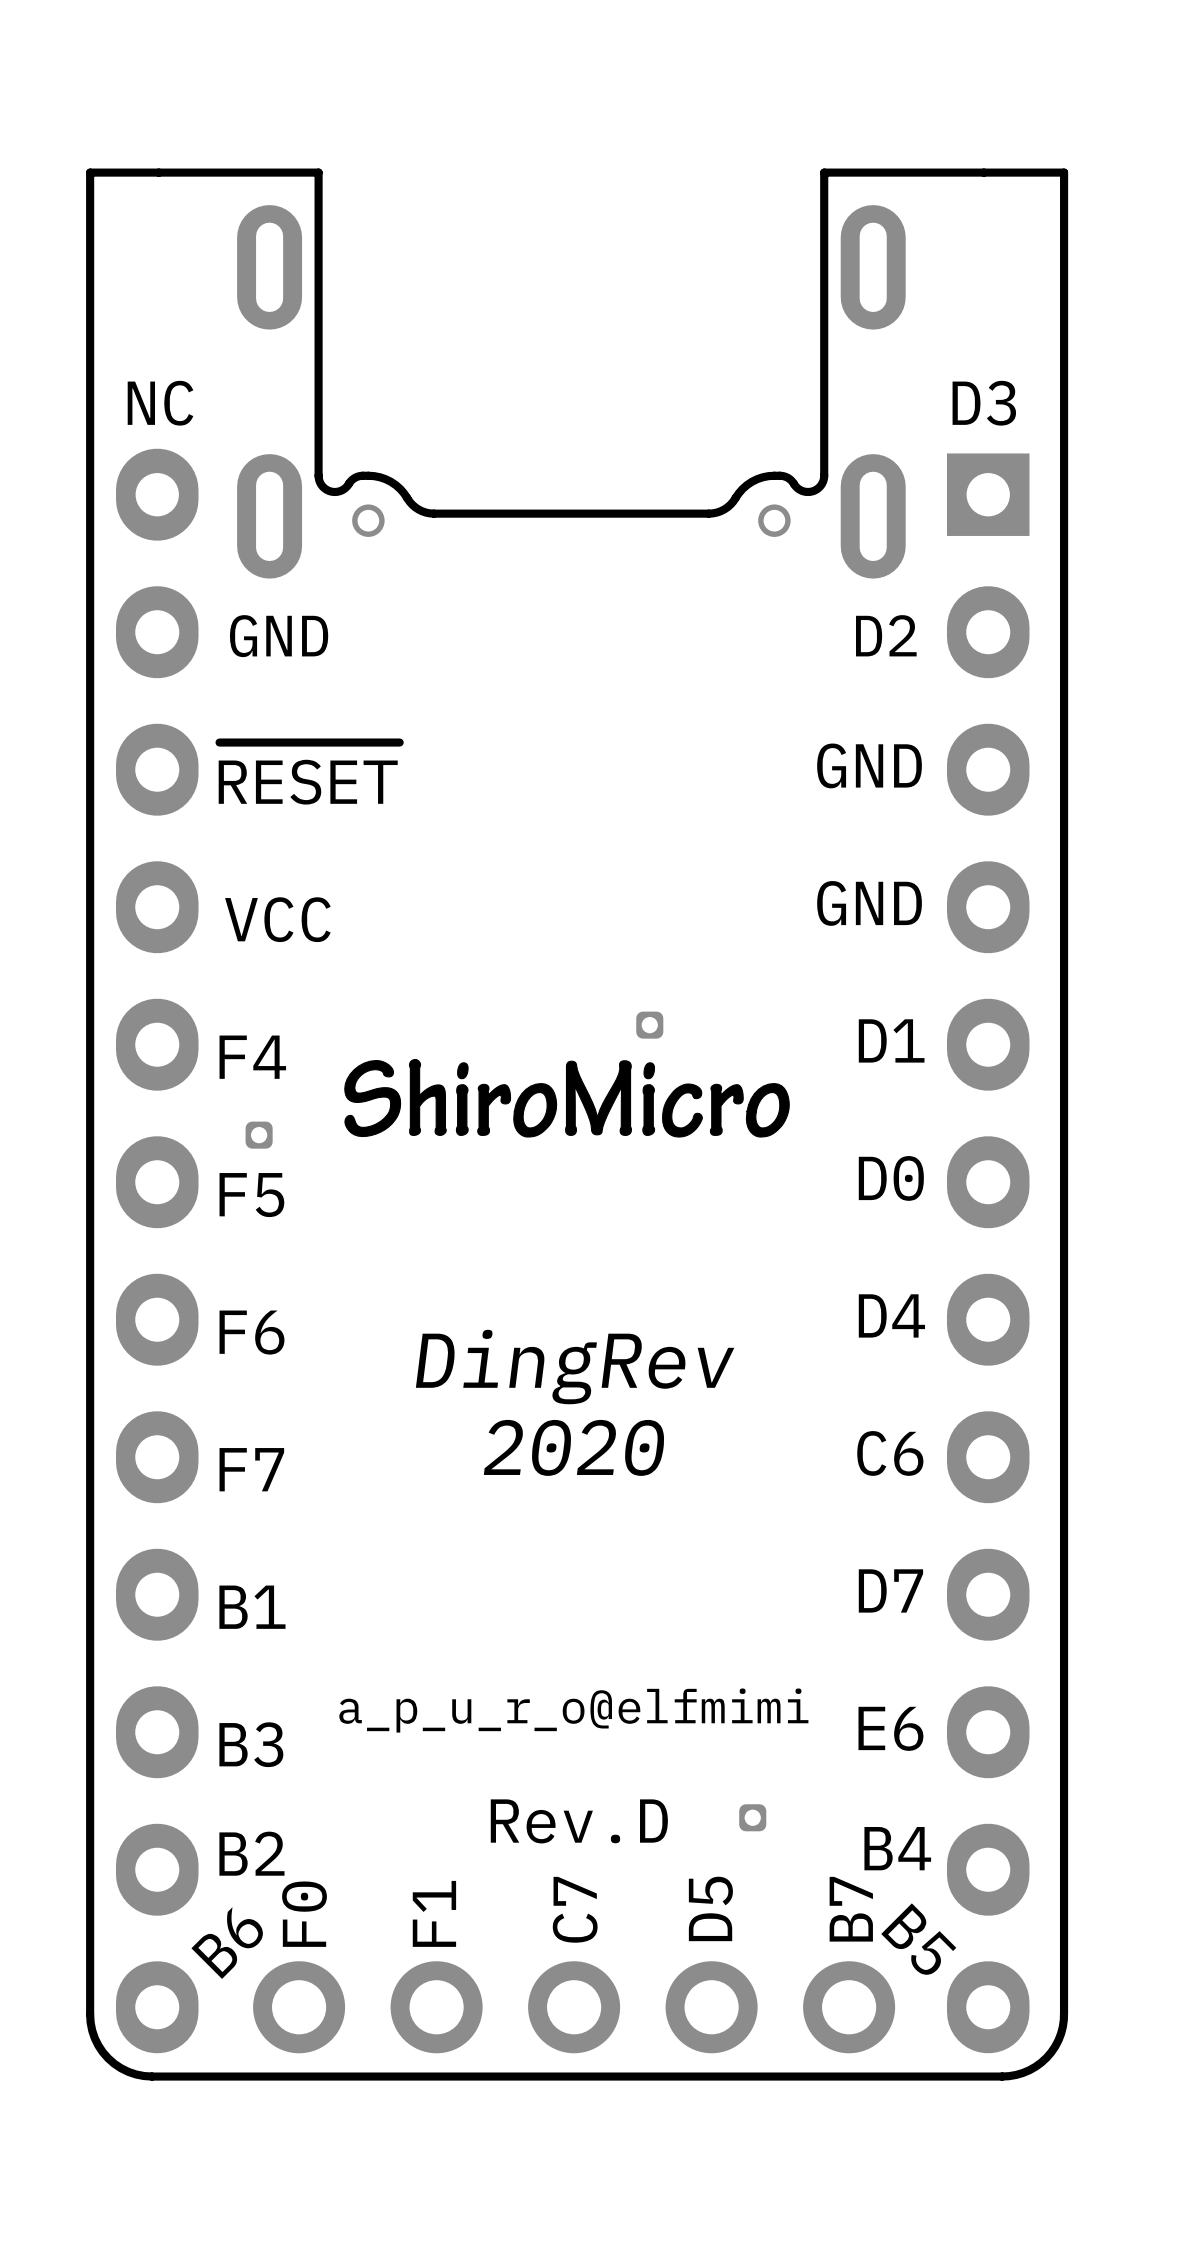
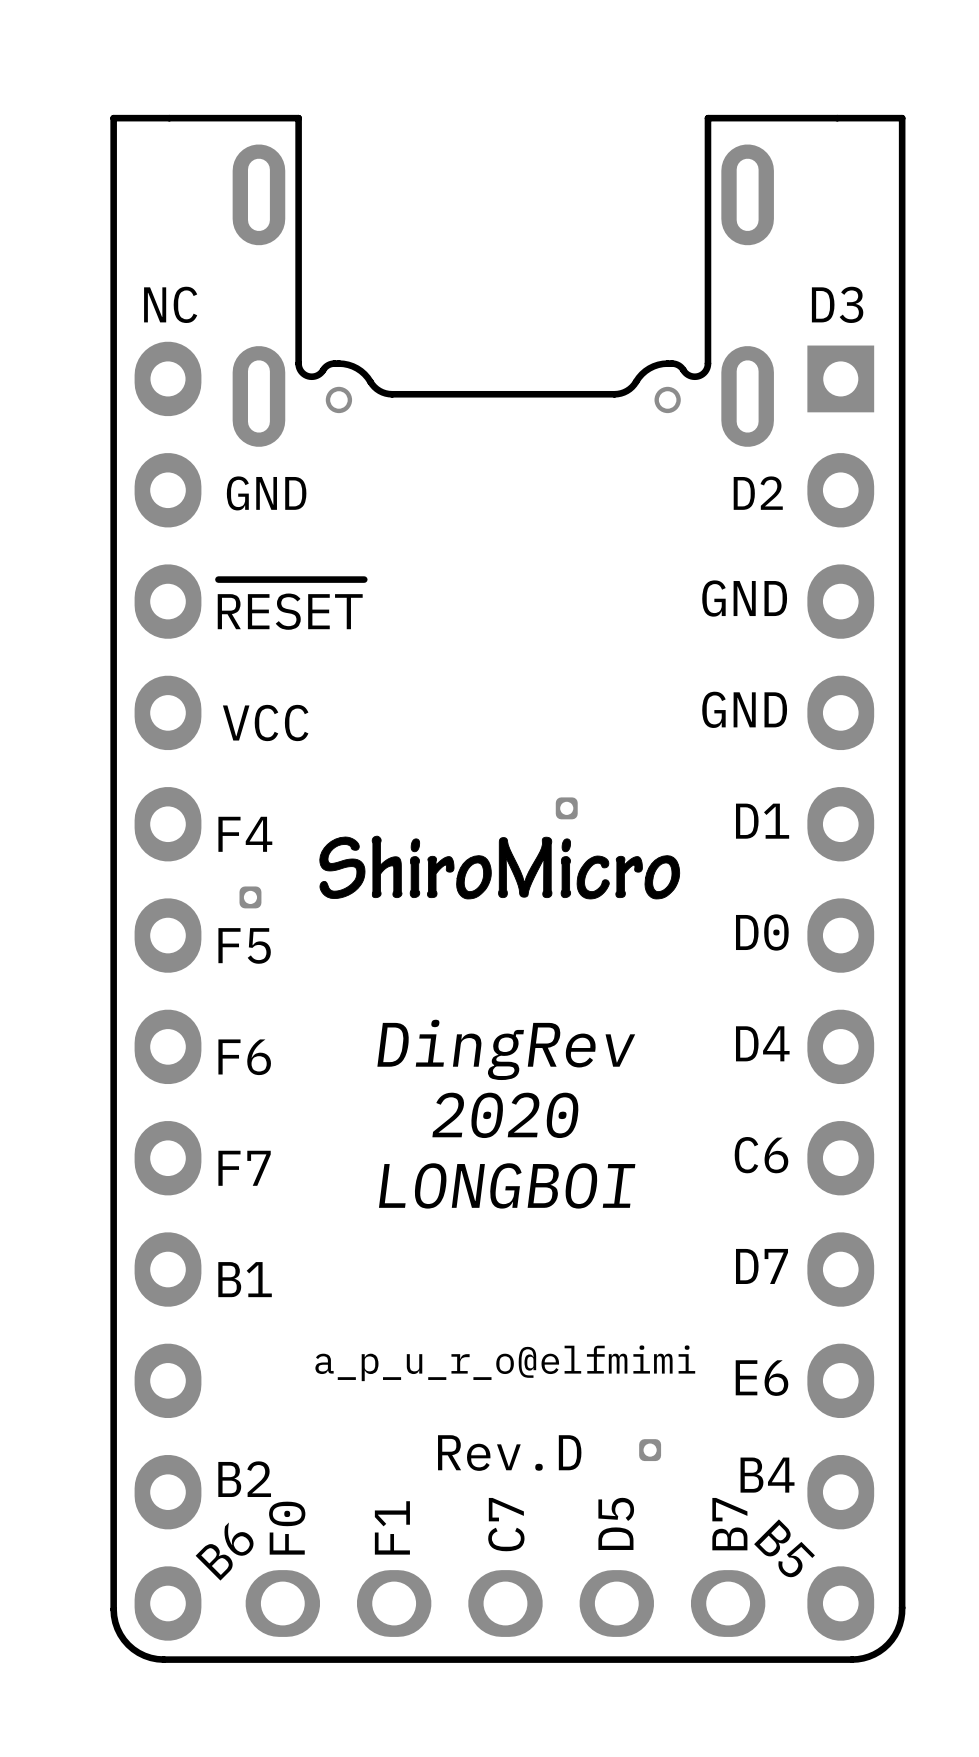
text position: DingRev (575, 1367) -> DingRev (506, 1049)
text position: 2020 (574, 1447) -> 2020 (505, 1115)
text: none -> LONGBOI (507, 1185)
text: B3 (251, 1744) -> none
part footprint: [253, 1961, 896, 2054] -> [245, 1570, 766, 1637]

